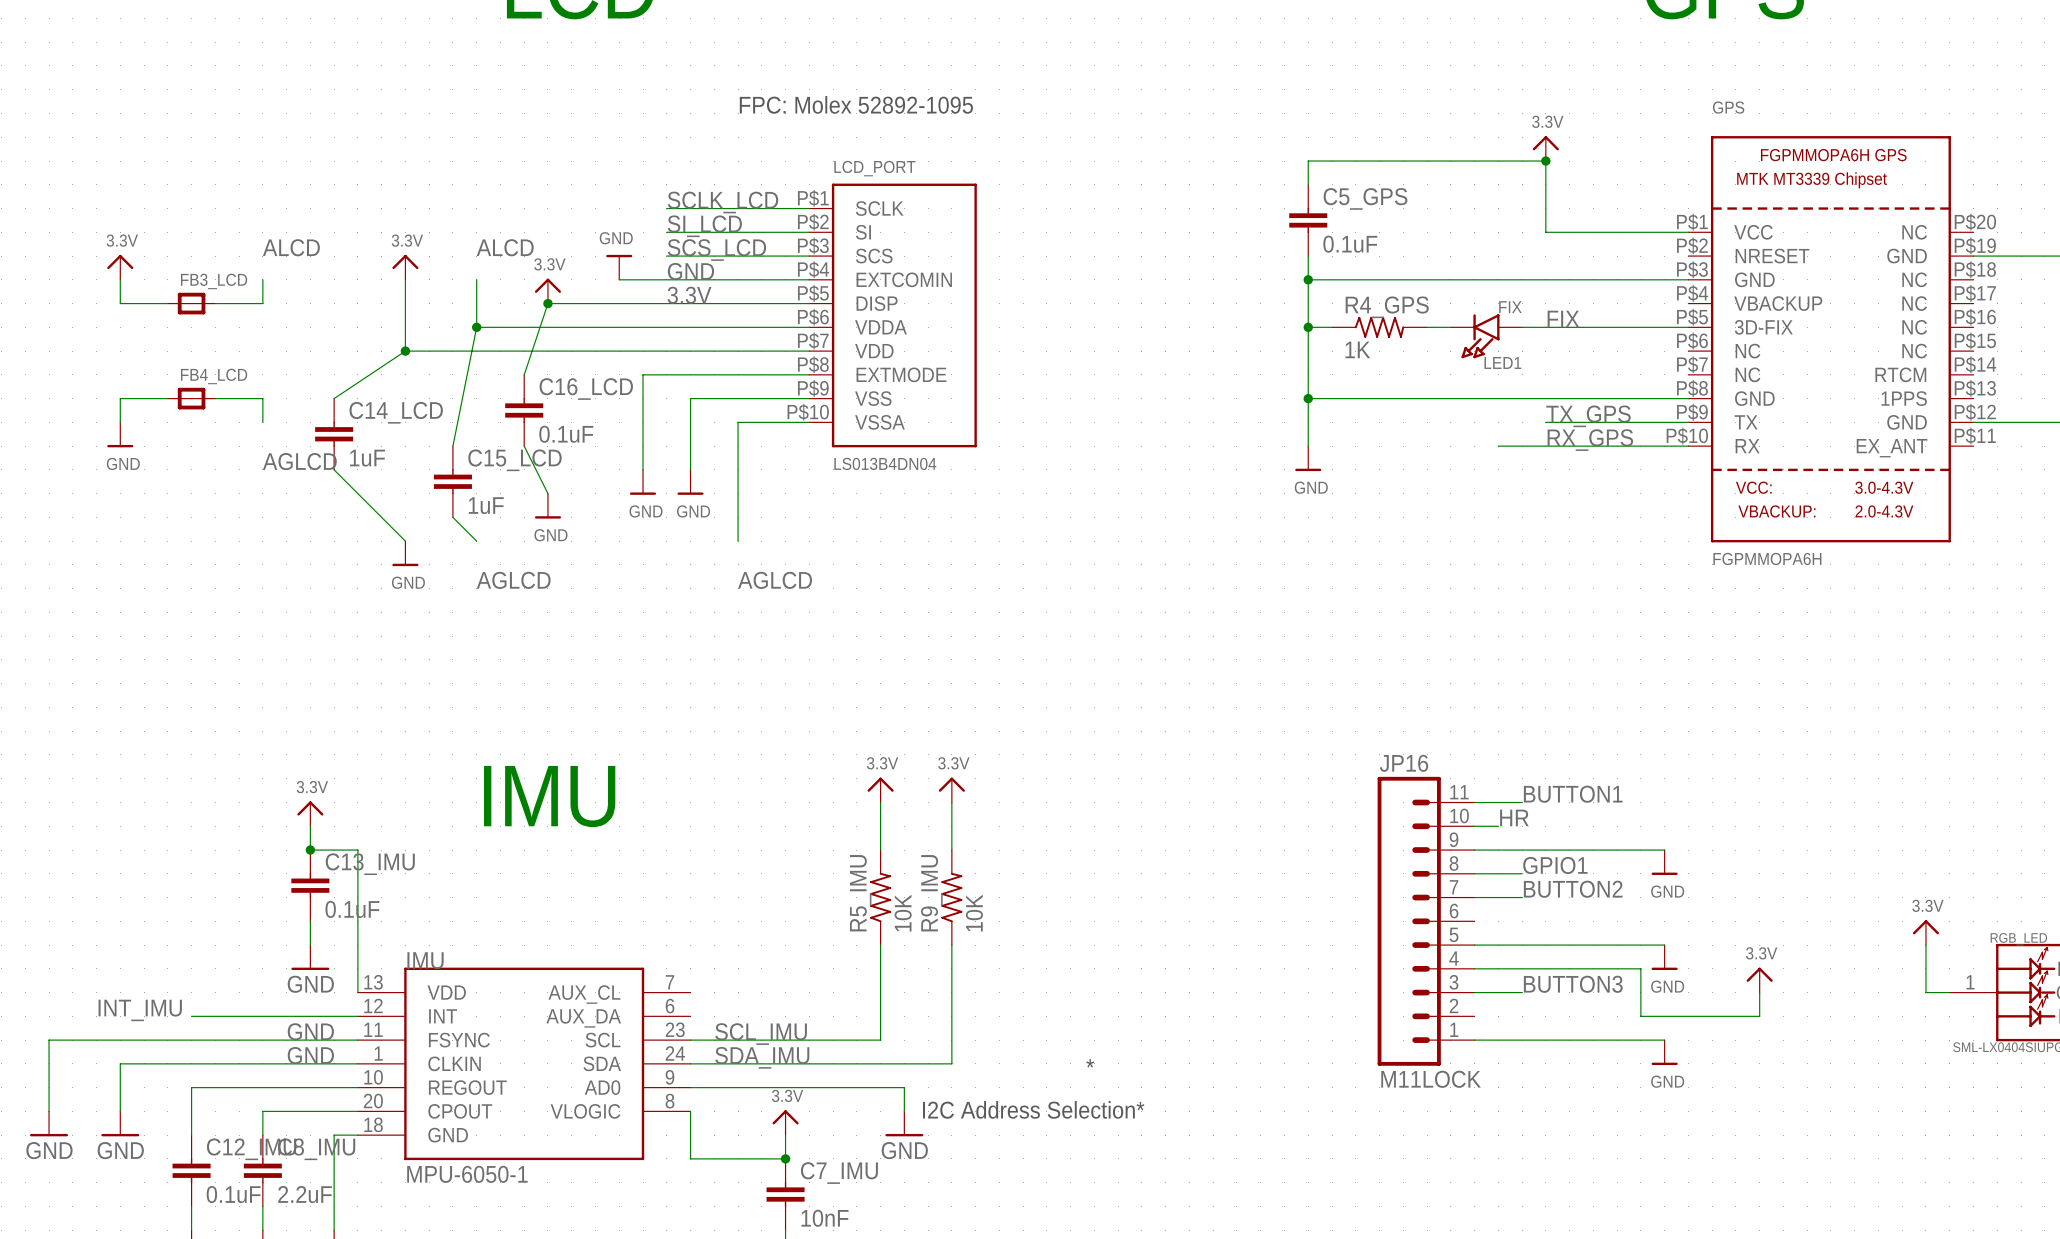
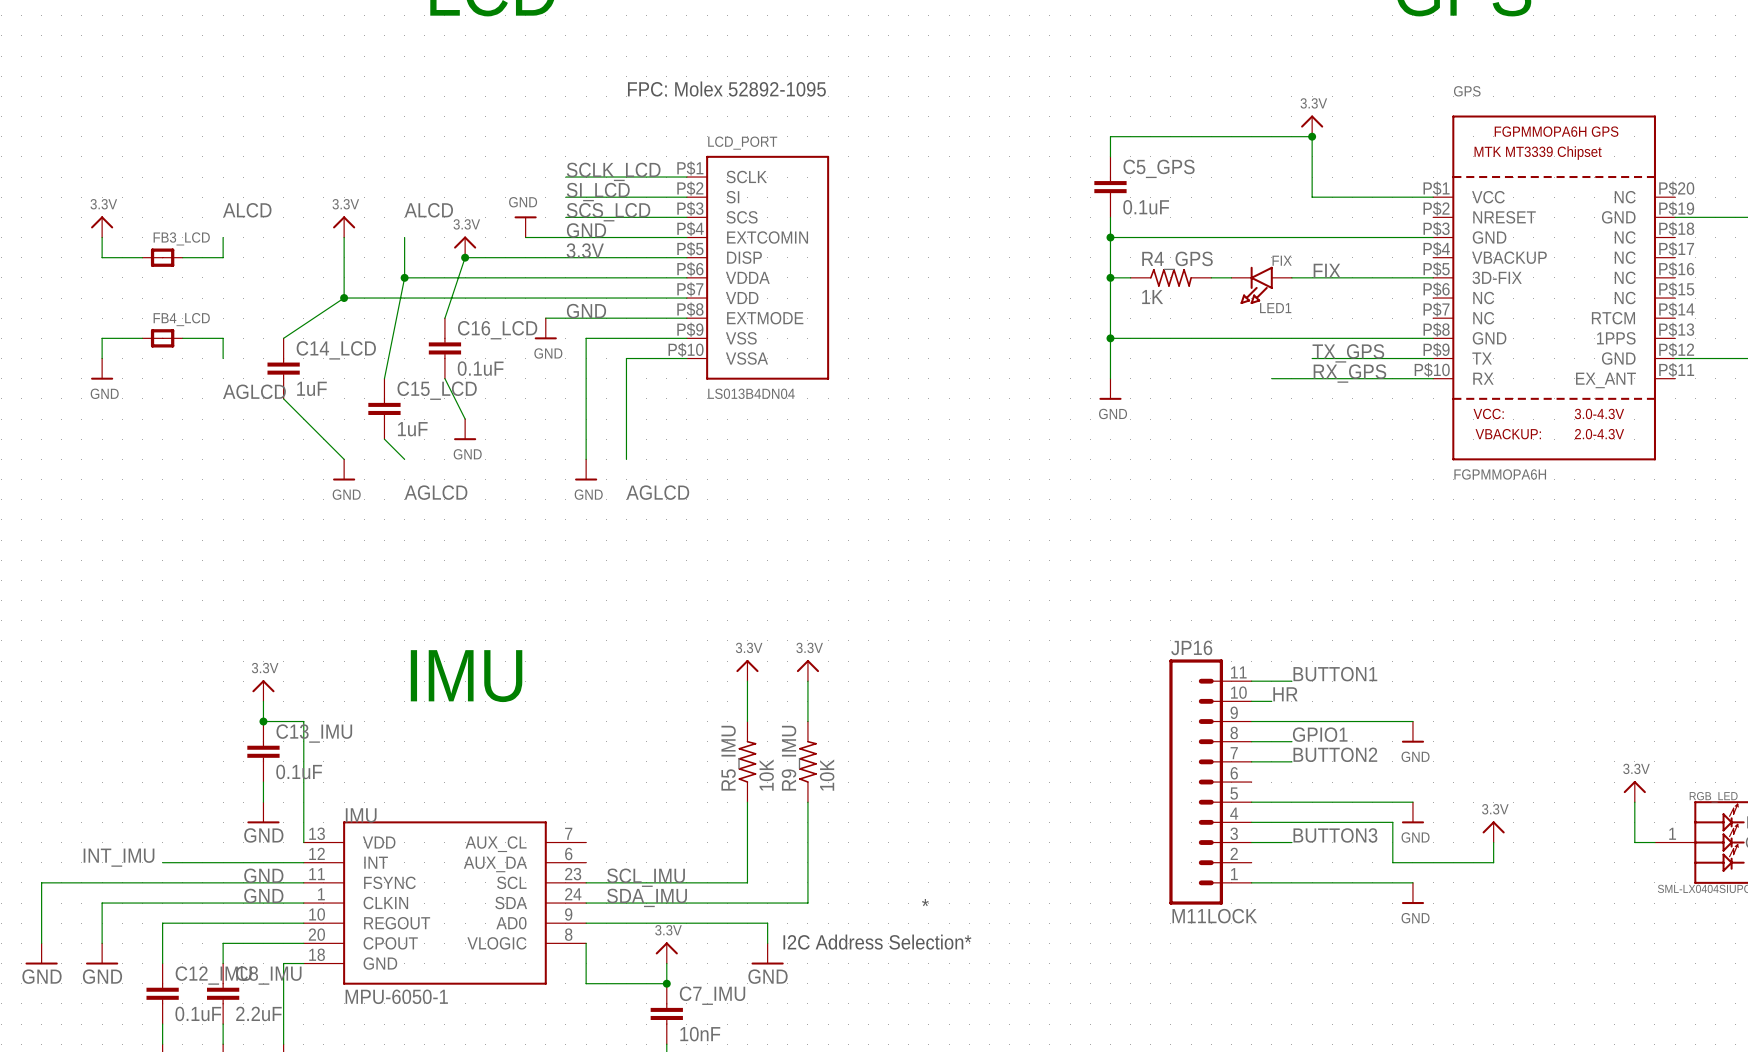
label: none -> GND (586, 311)
wire: (643, 374) (643, 469) -> none
power symbol: none -> GND (545, 328)
wire: none -> (586, 398) (586, 459)
power symbol: GND (643, 482) -> none
power symbol: GND (690, 482) -> none
power symbol: none -> GND (586, 469)

